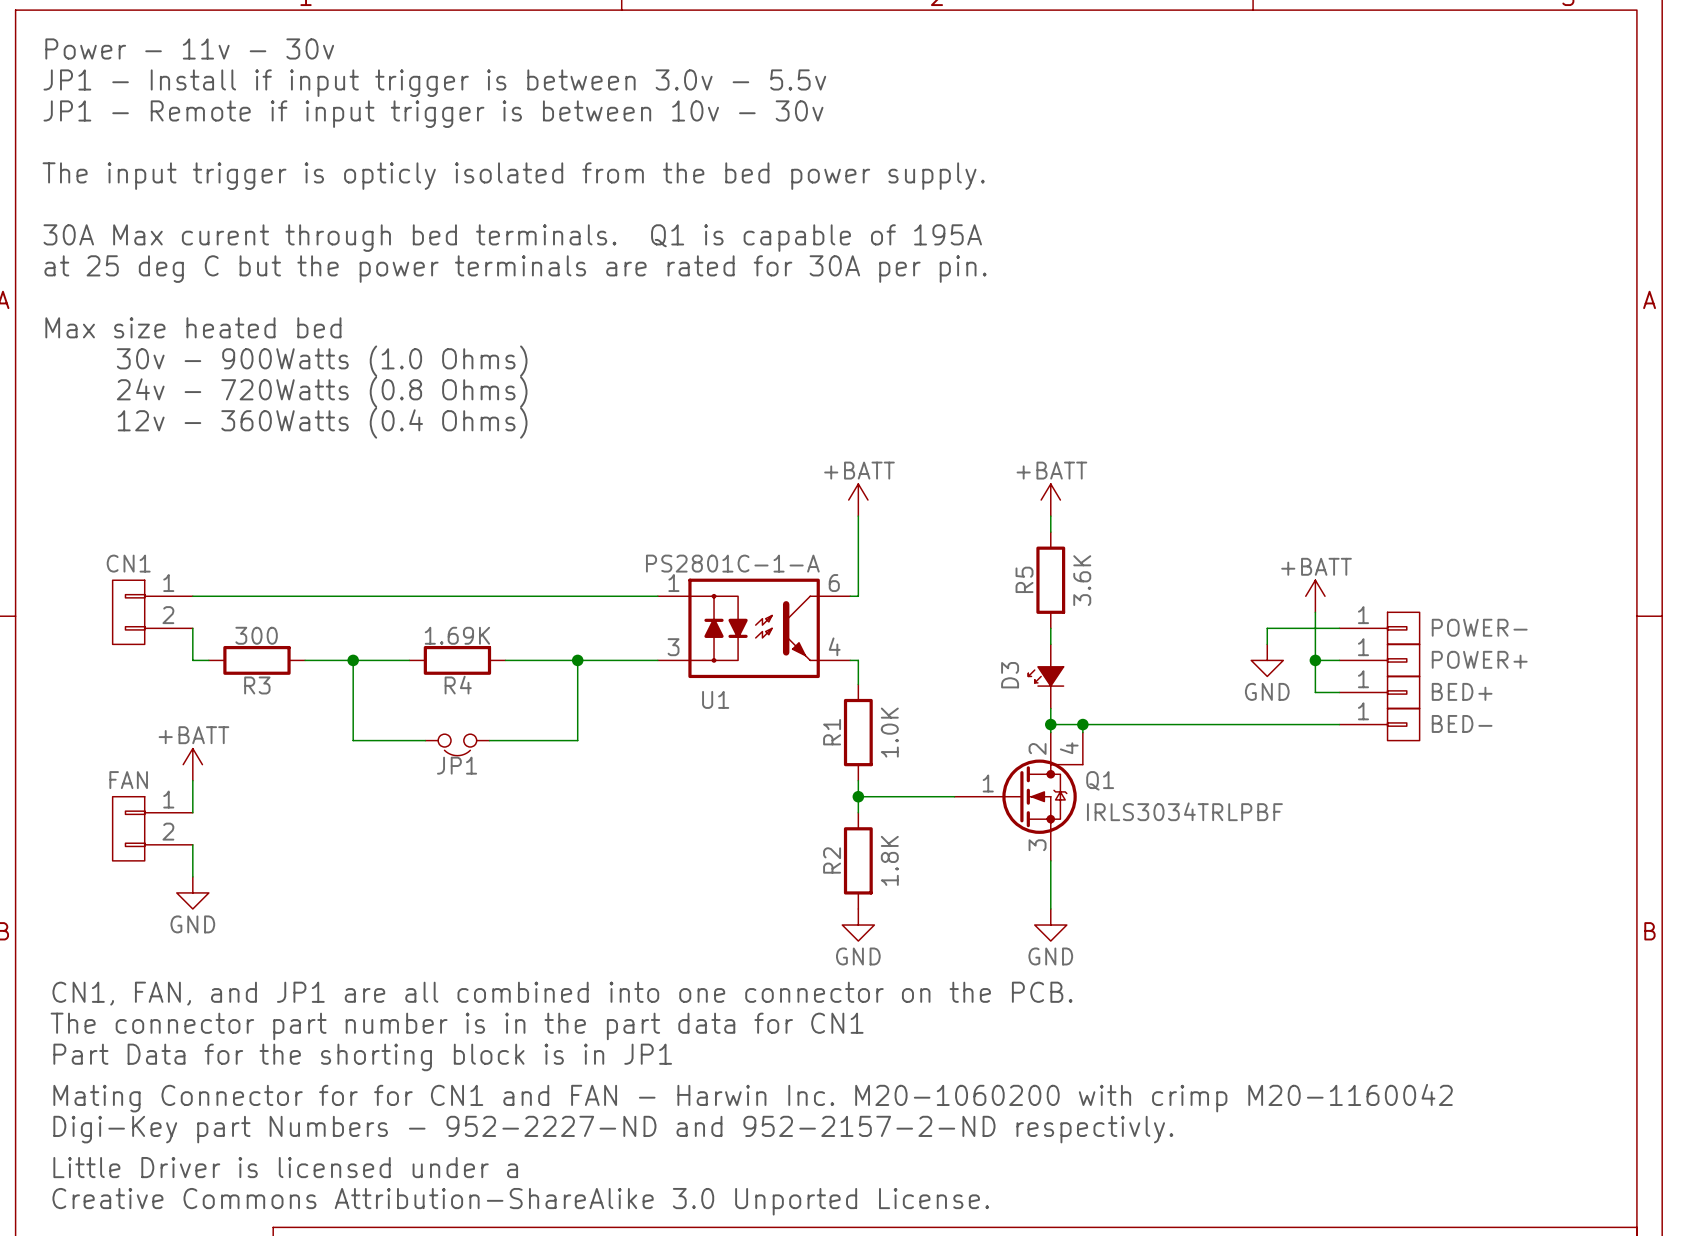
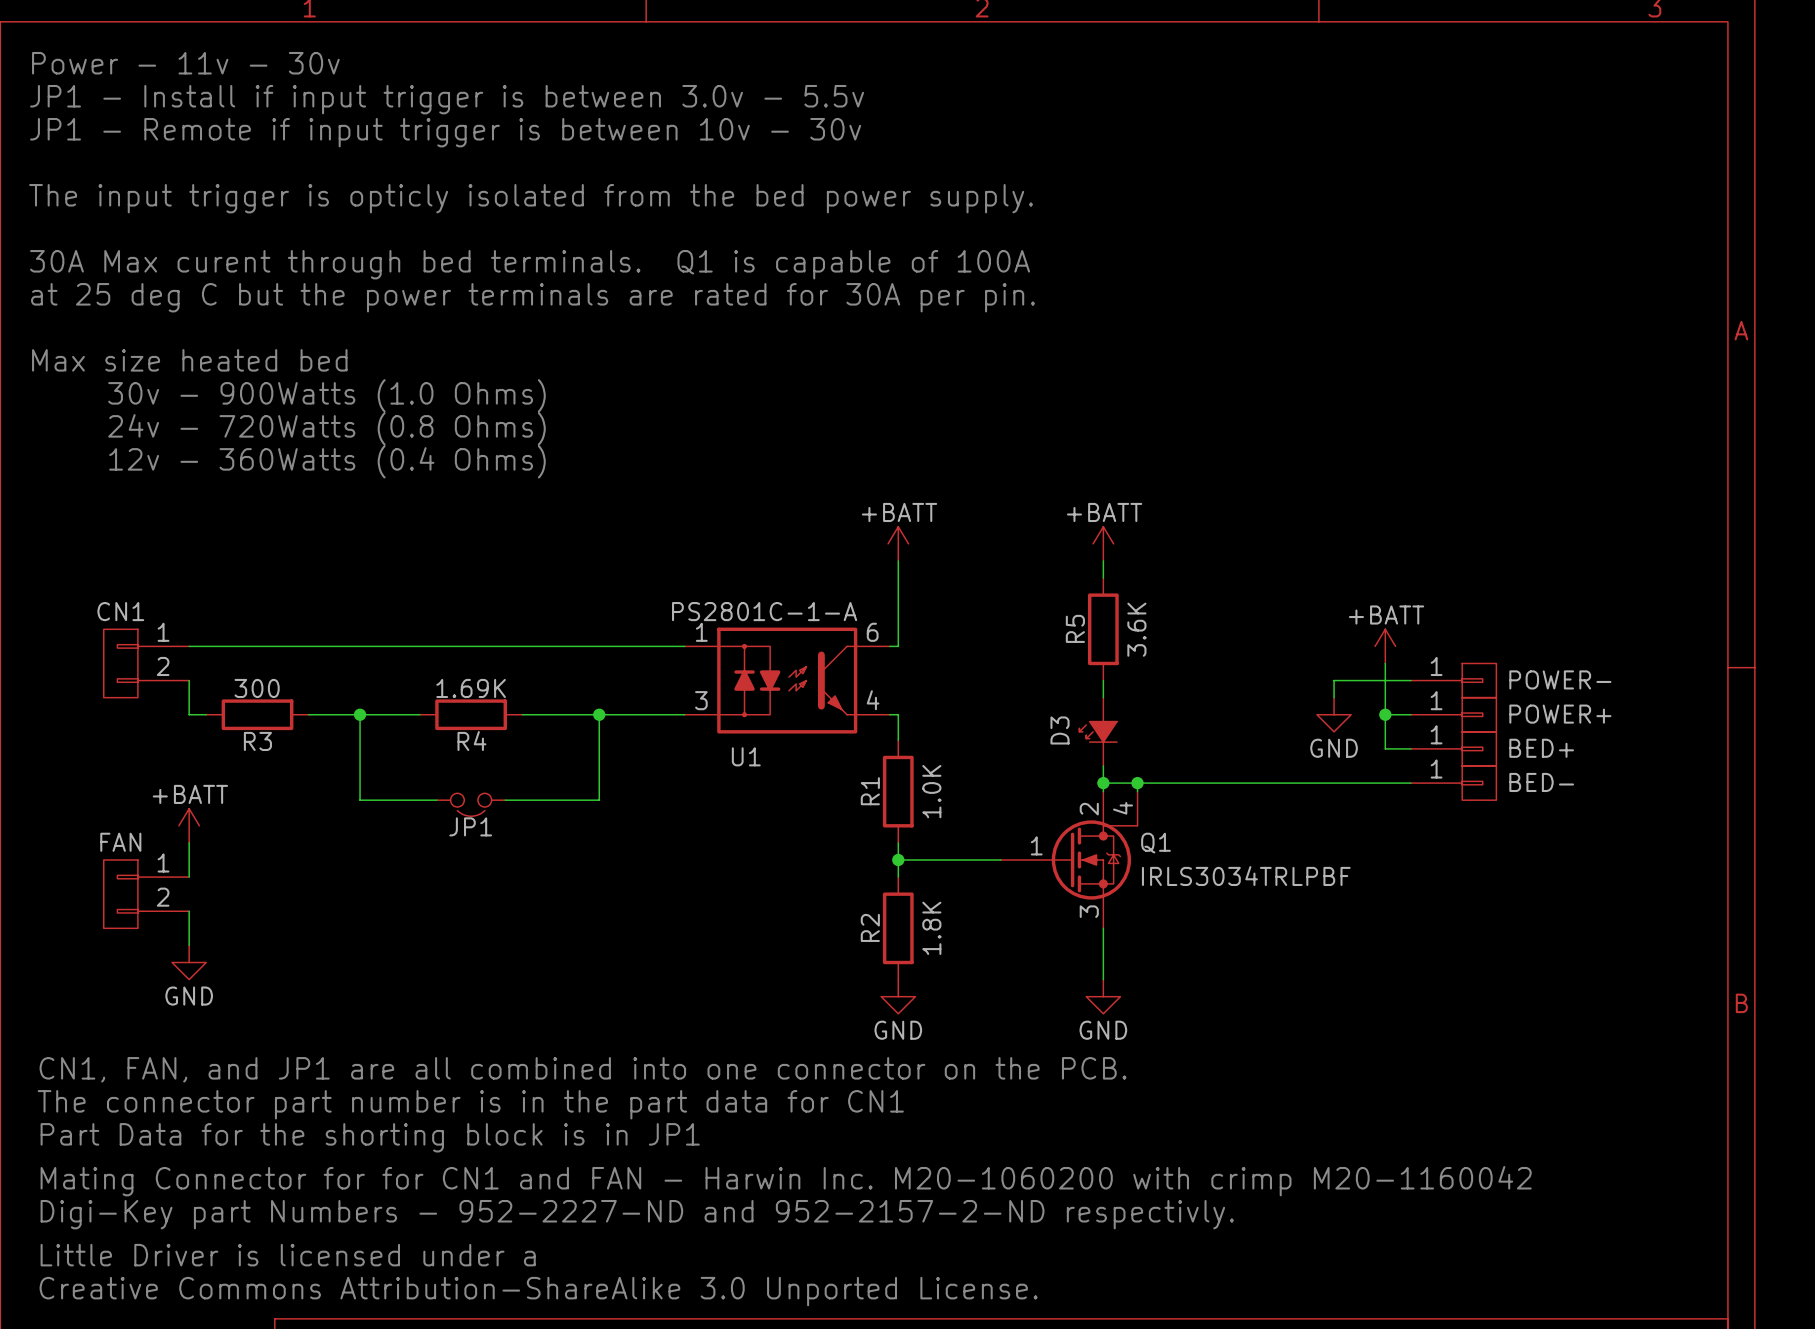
text: 30A Max curent through bed terminals. Q1 is capable of 195A (512, 238) -> 30A Max curent through bed terminals. Q1 is capable of 100A (530, 264)

